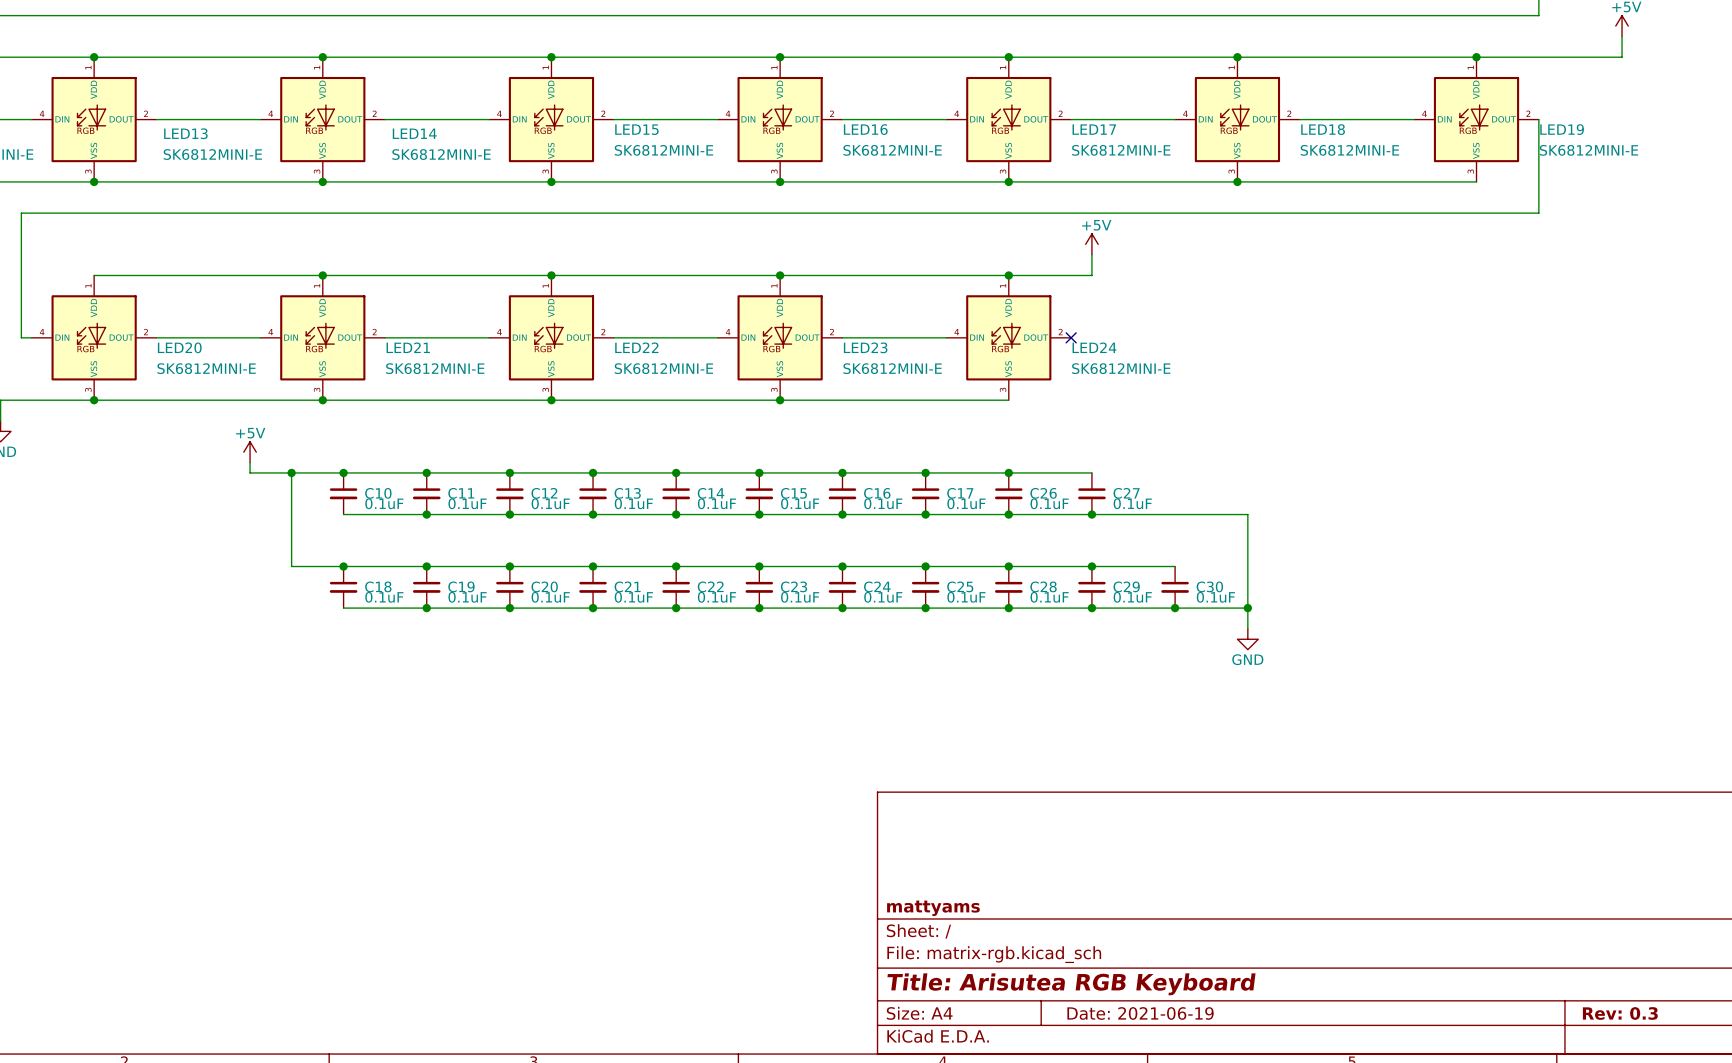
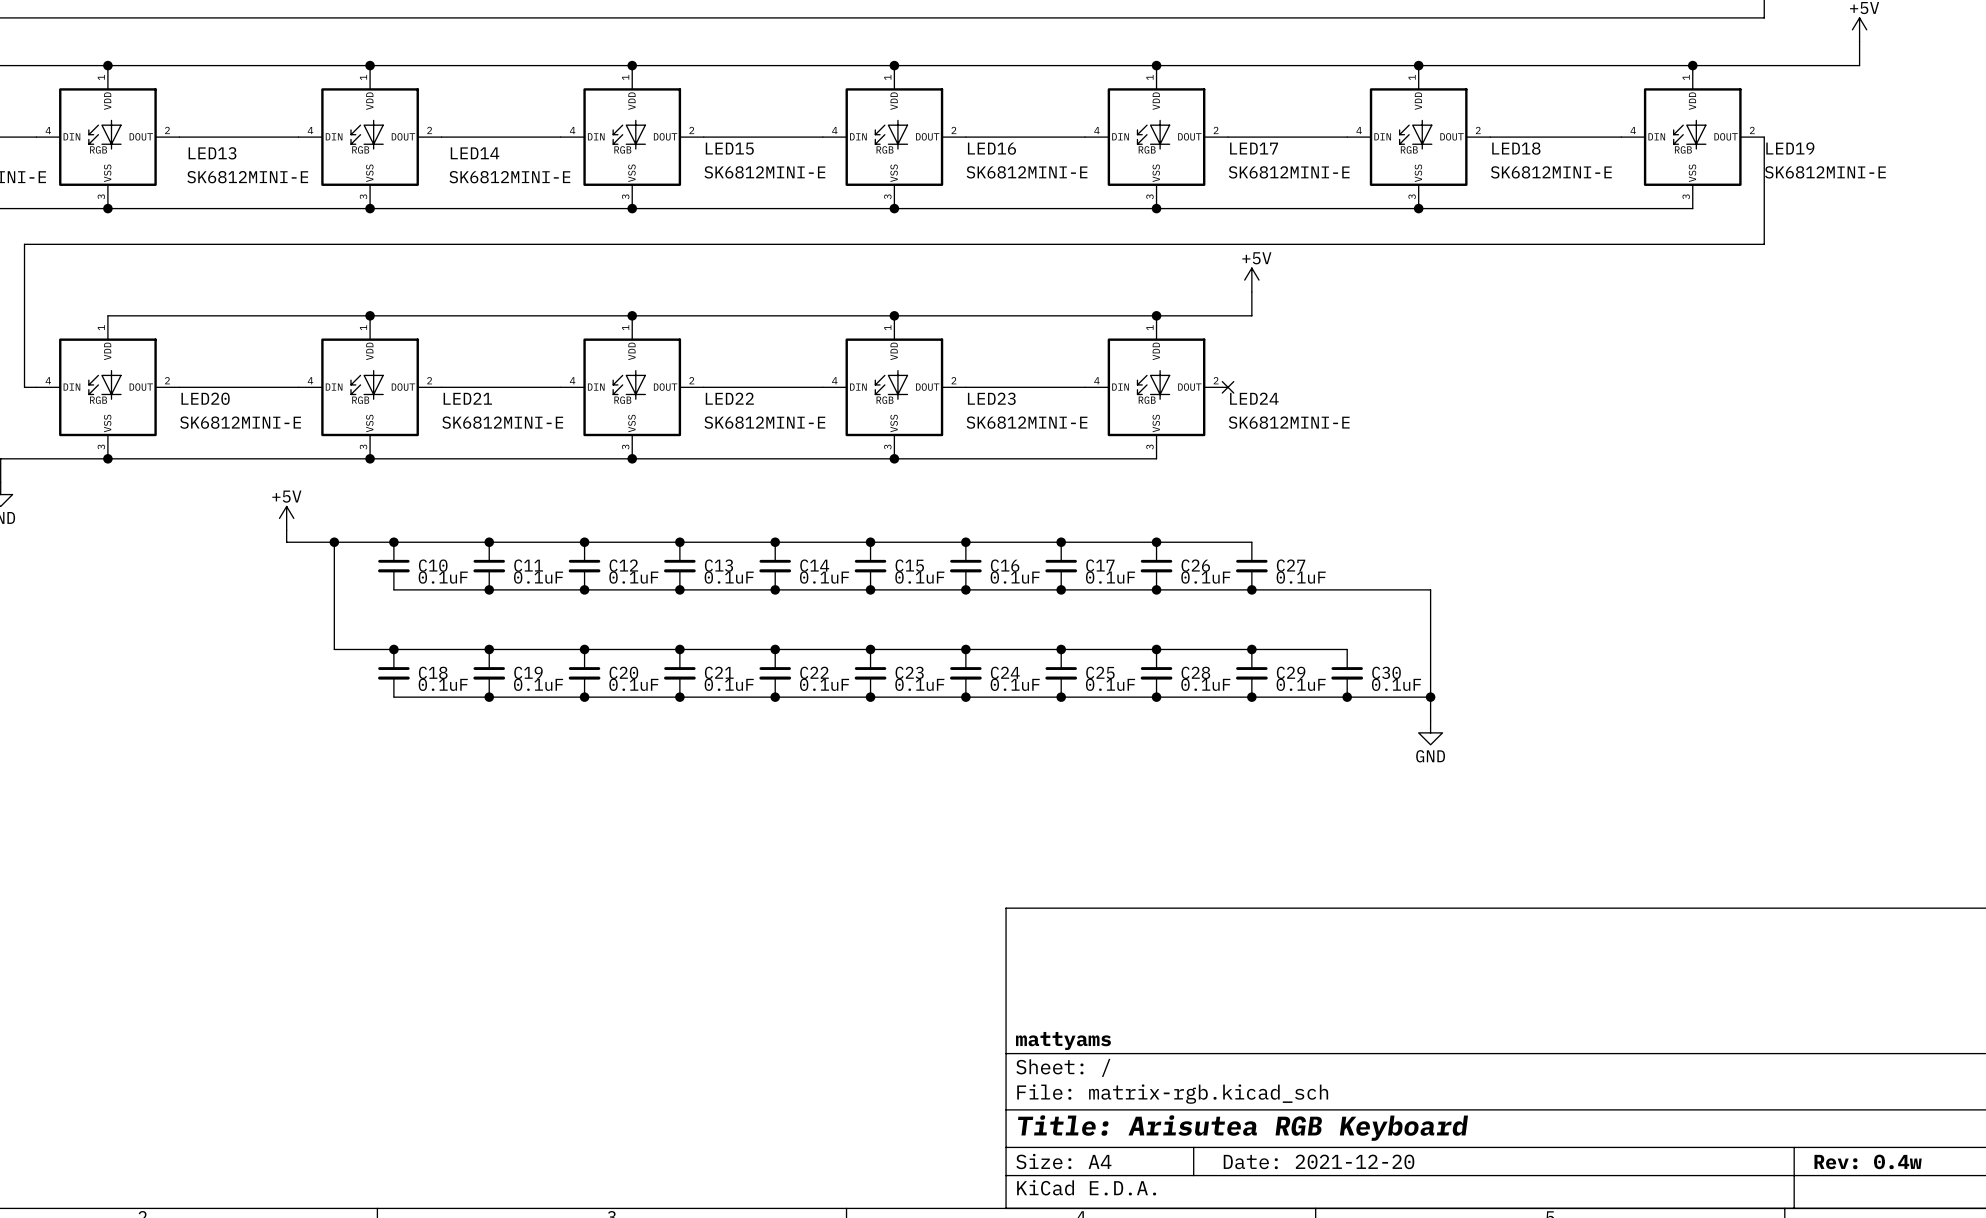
title block: Date: 2021-06-19 (1140, 1013) -> Date: 2021-12-20 (1319, 1161)
title block: Rev: 0.3 (1620, 1013) -> Rev: 0.4w (1868, 1161)

